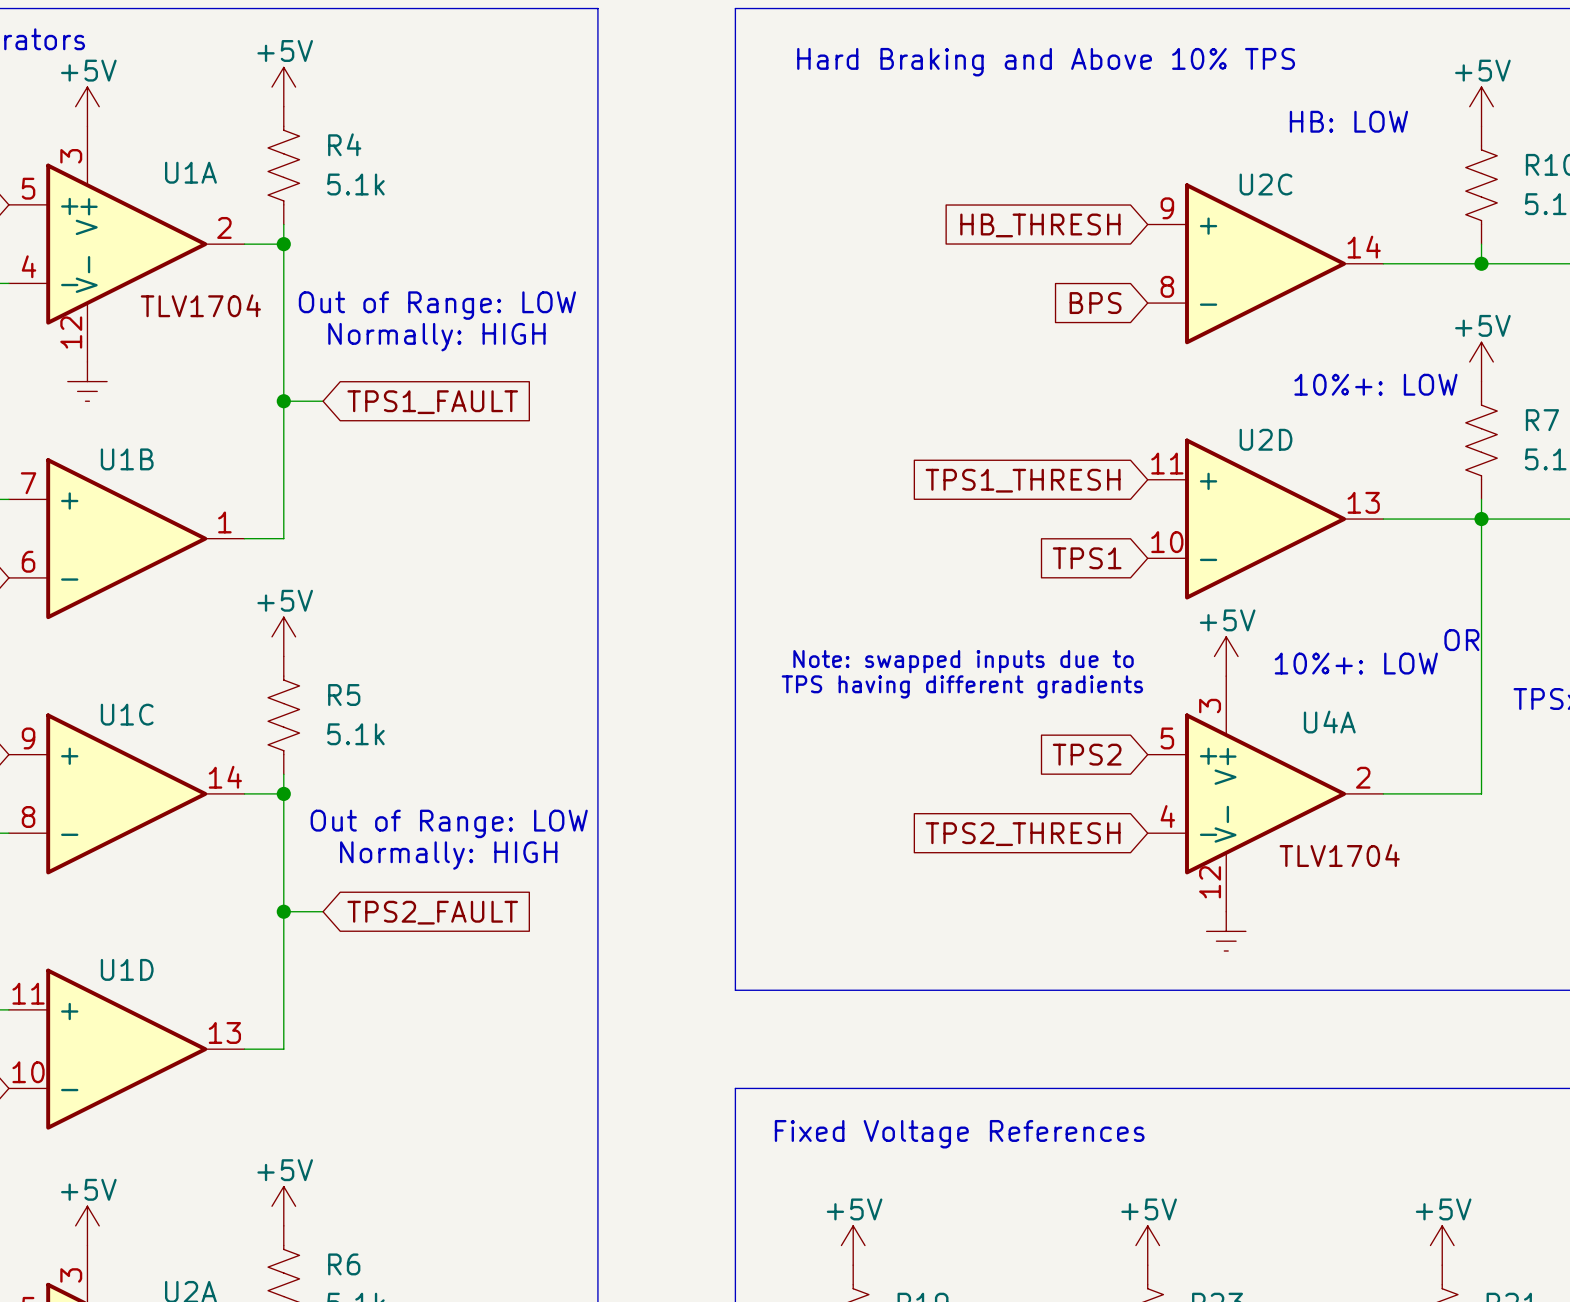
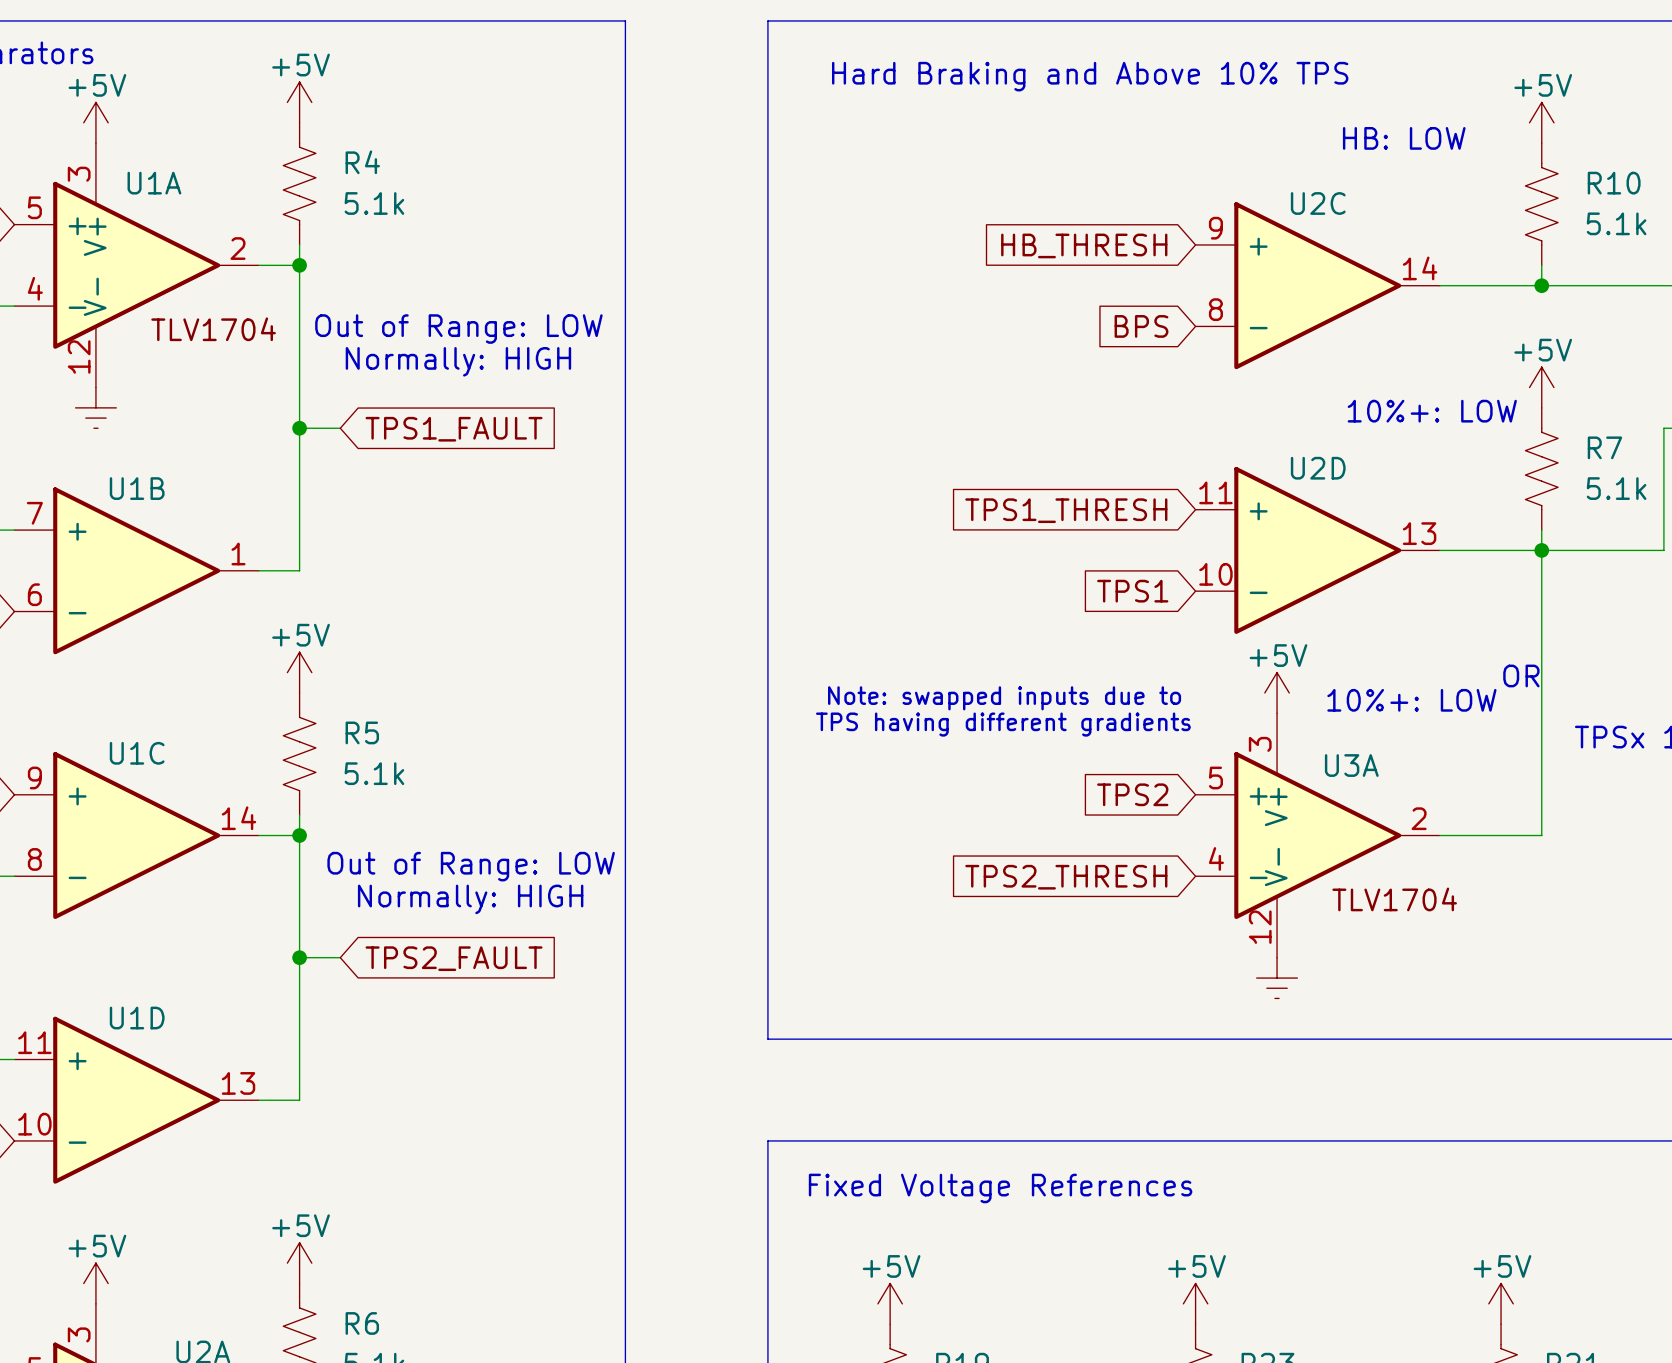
U1A name position: U1A (190, 172) -> U1A (154, 183)
U4A name: U4A (1329, 722) -> U3A (1351, 765)

